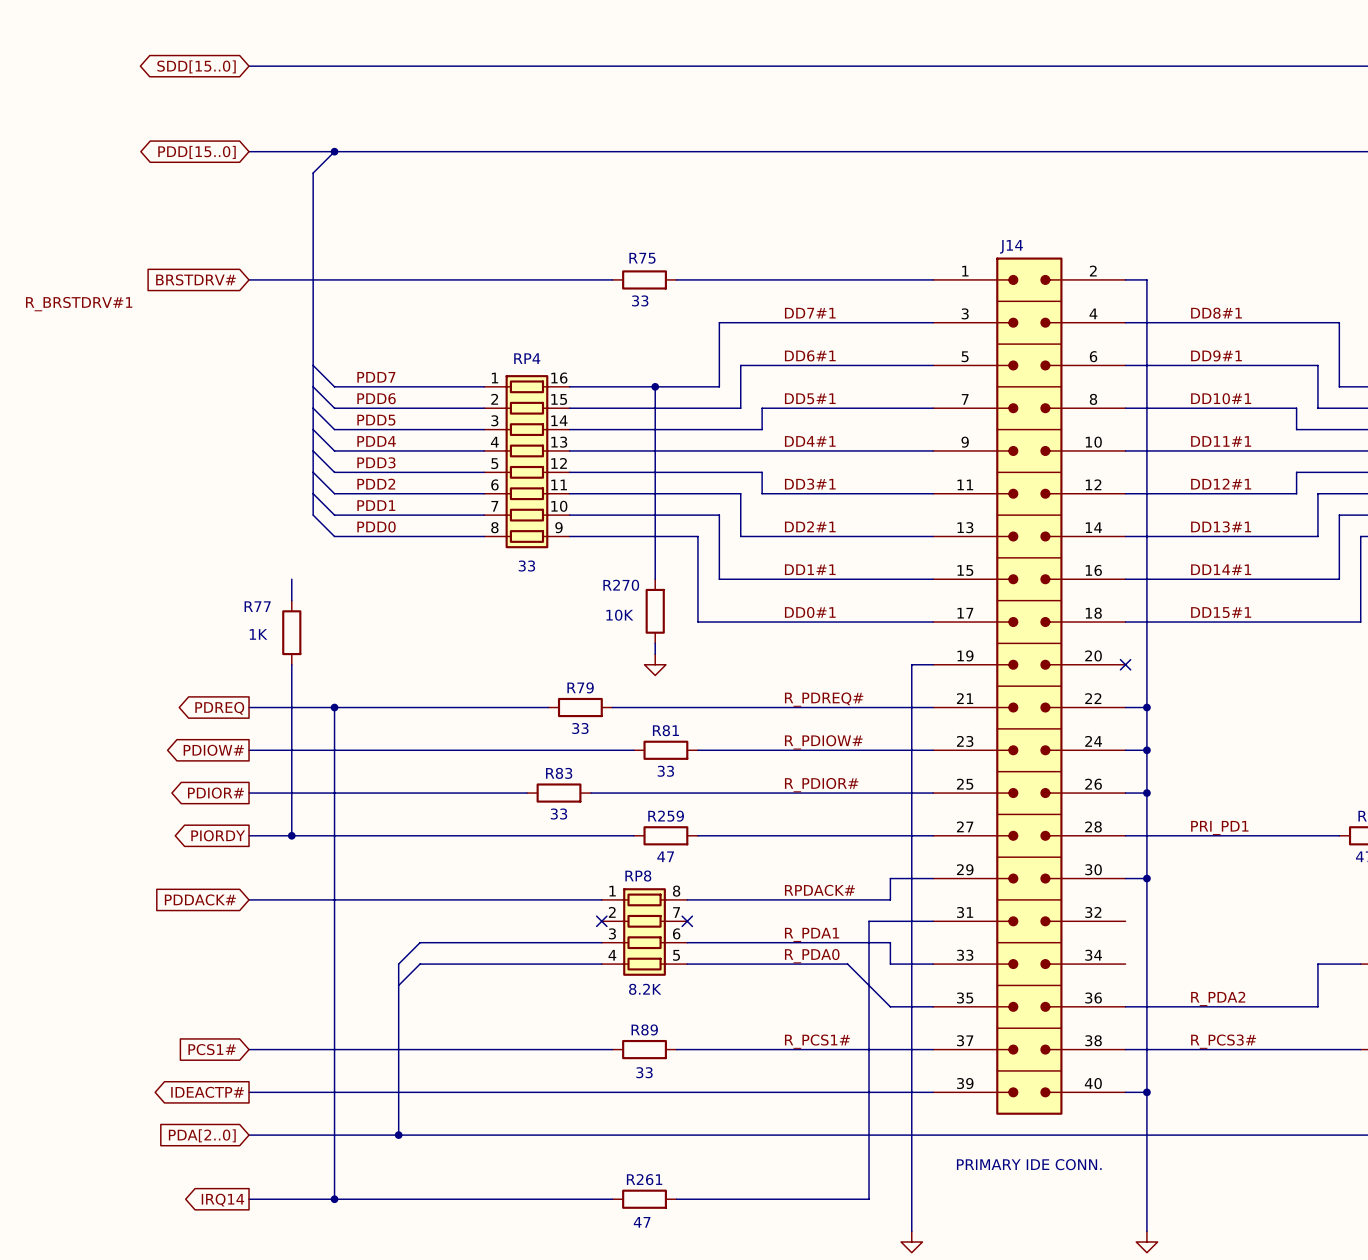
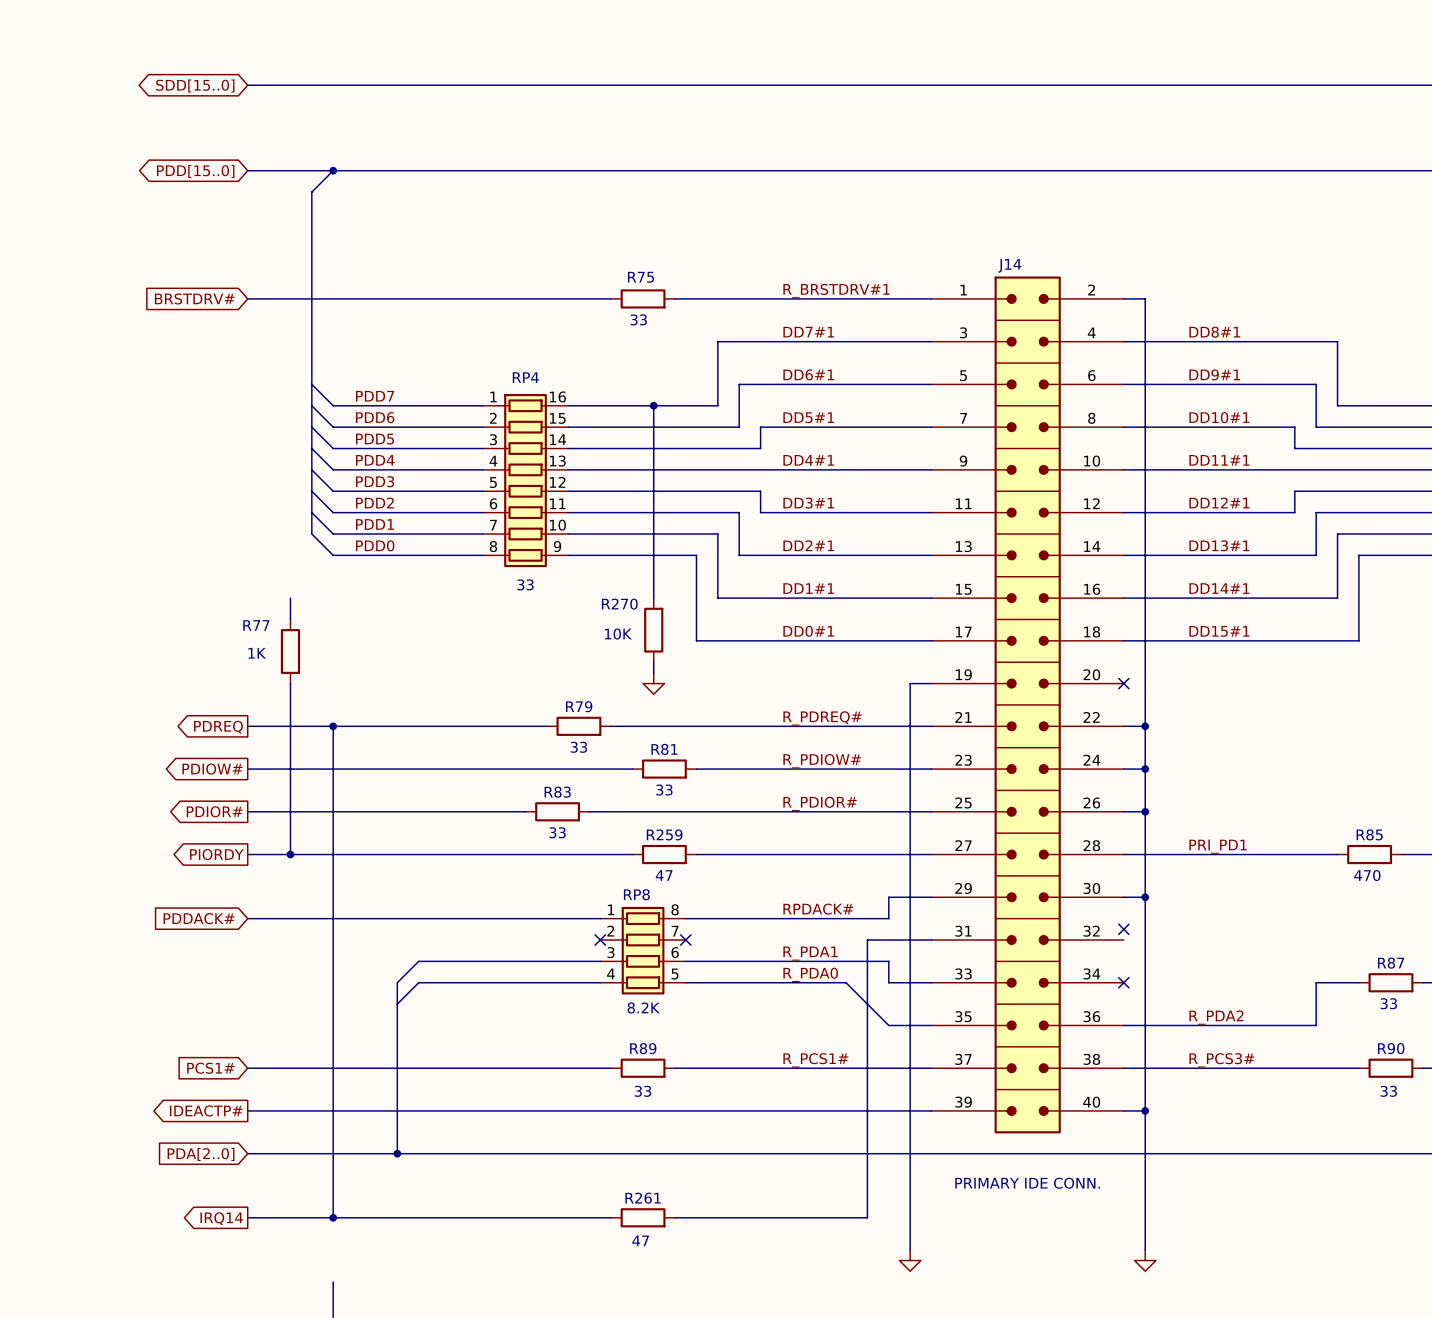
label: none -> R_BRSTDRV#1 (836, 291)
label: R_BRSTDRV#1 (79, 304) -> none
no-connect mark: none -> (1123, 929)
no-connect mark: none -> (1123, 982)

